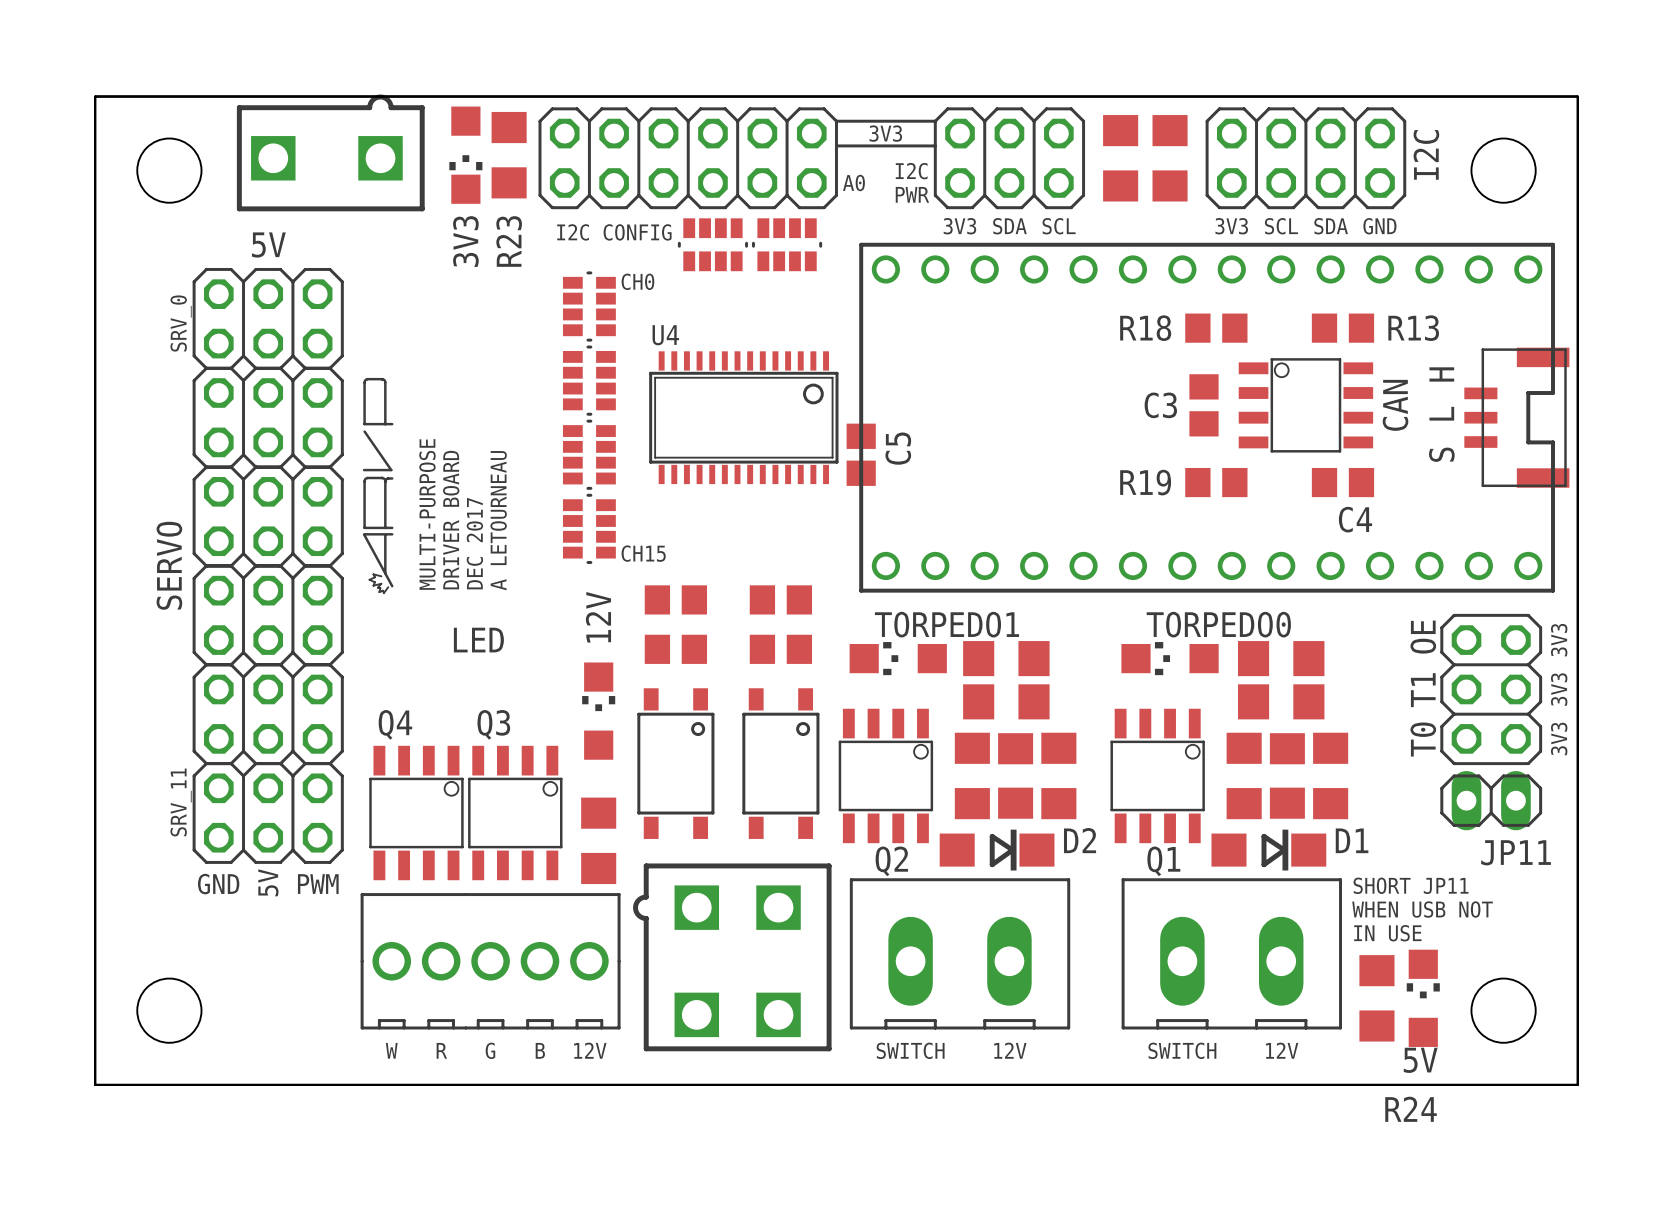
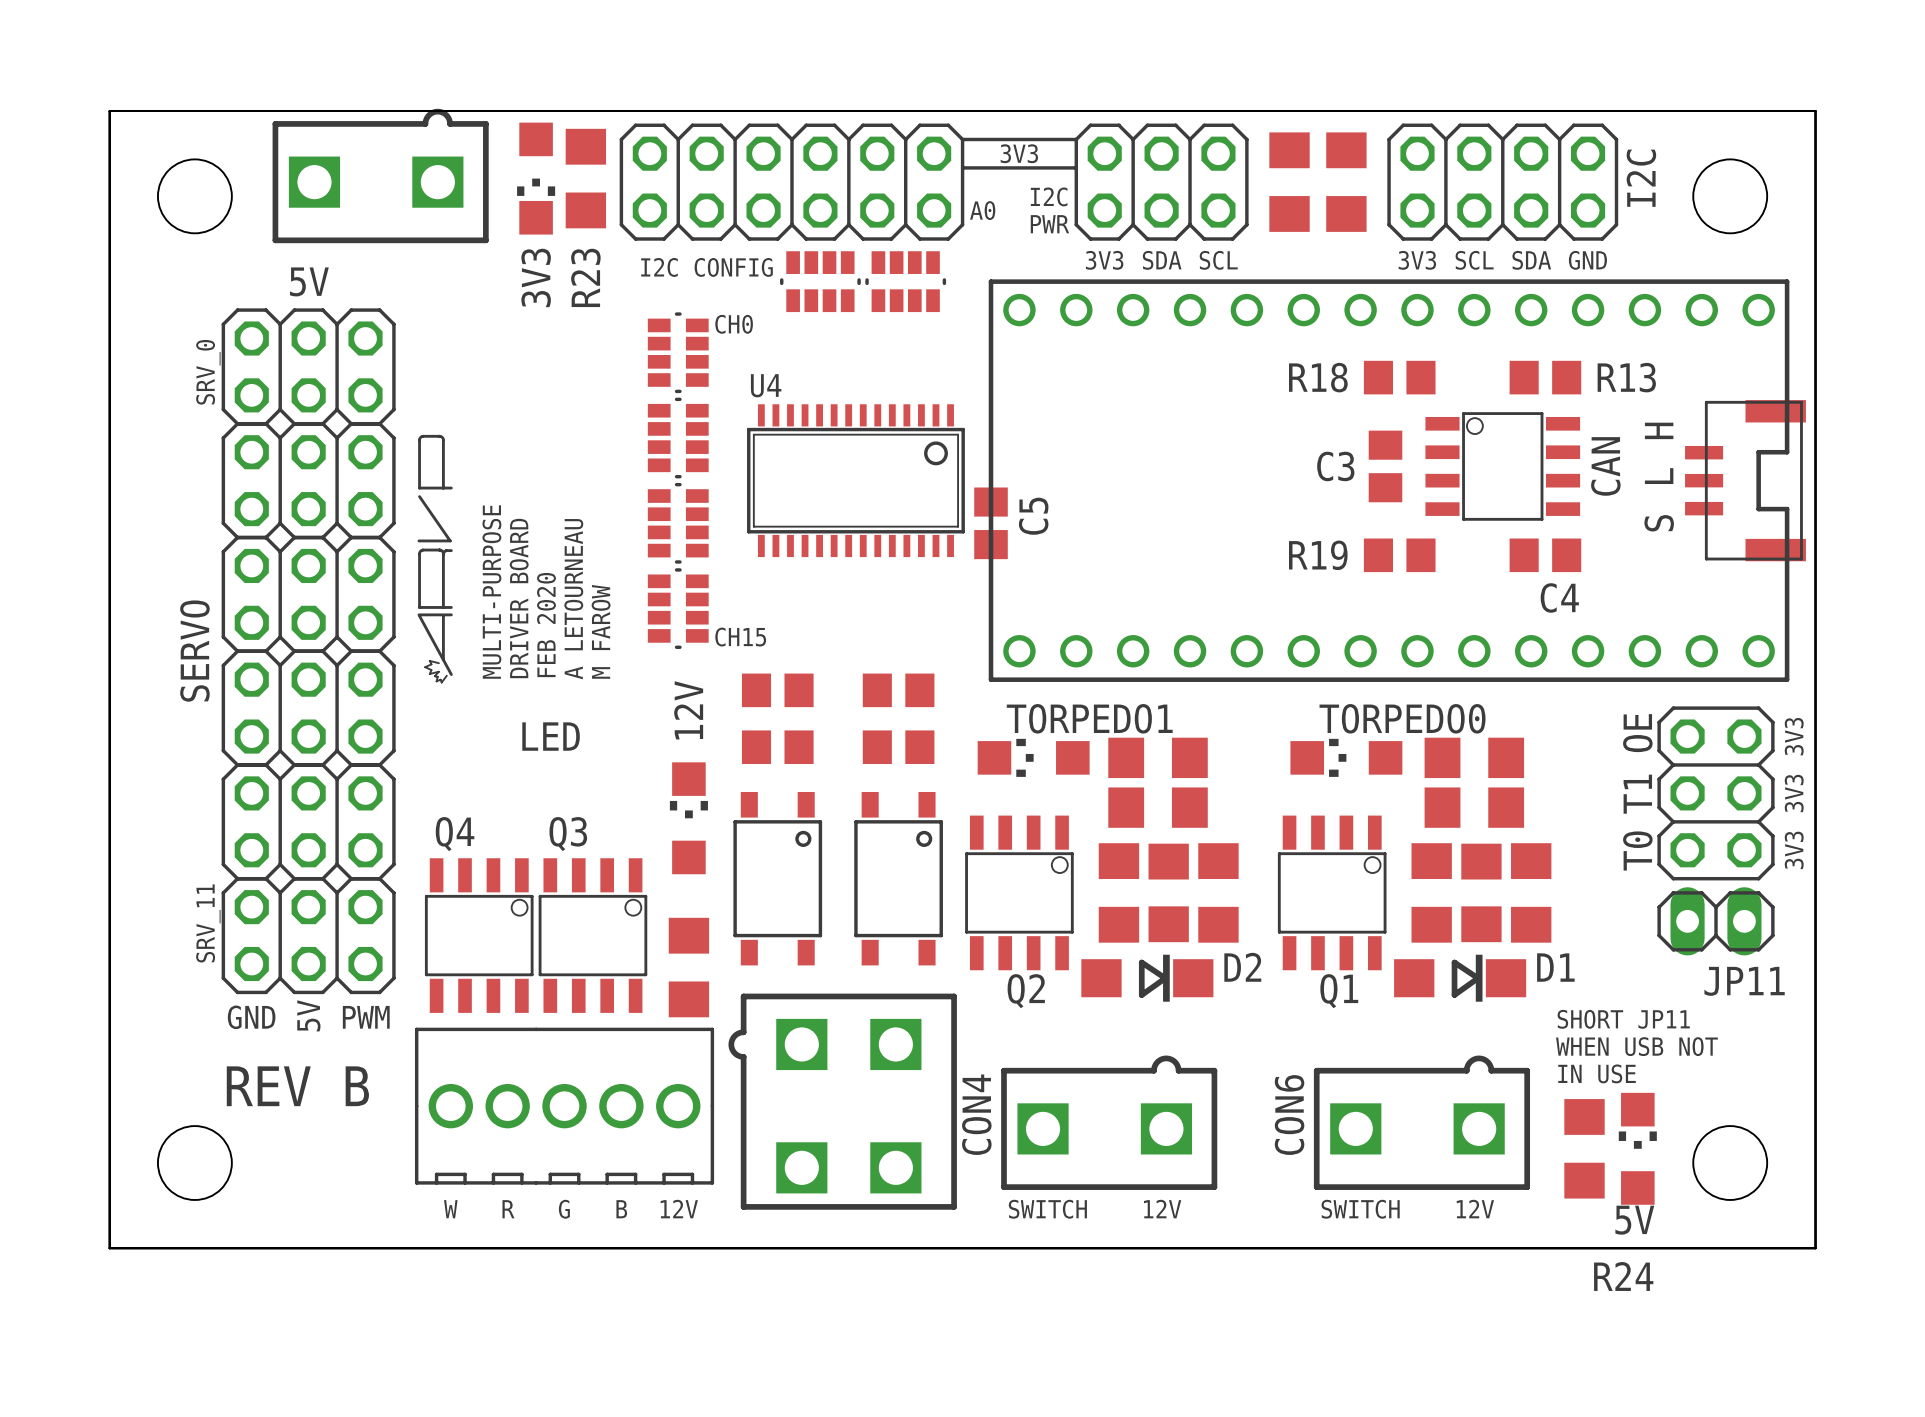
text: DEC 2017 (474, 543) -> FEB 2020 (546, 625)
text: none -> M FAROW (601, 631)
text: none -> REV B (297, 1086)
part: (960, 953) -> none
part: (1231, 953) -> none
CON4: none -> (1109, 1122)
CON6: none -> (1421, 1122)

